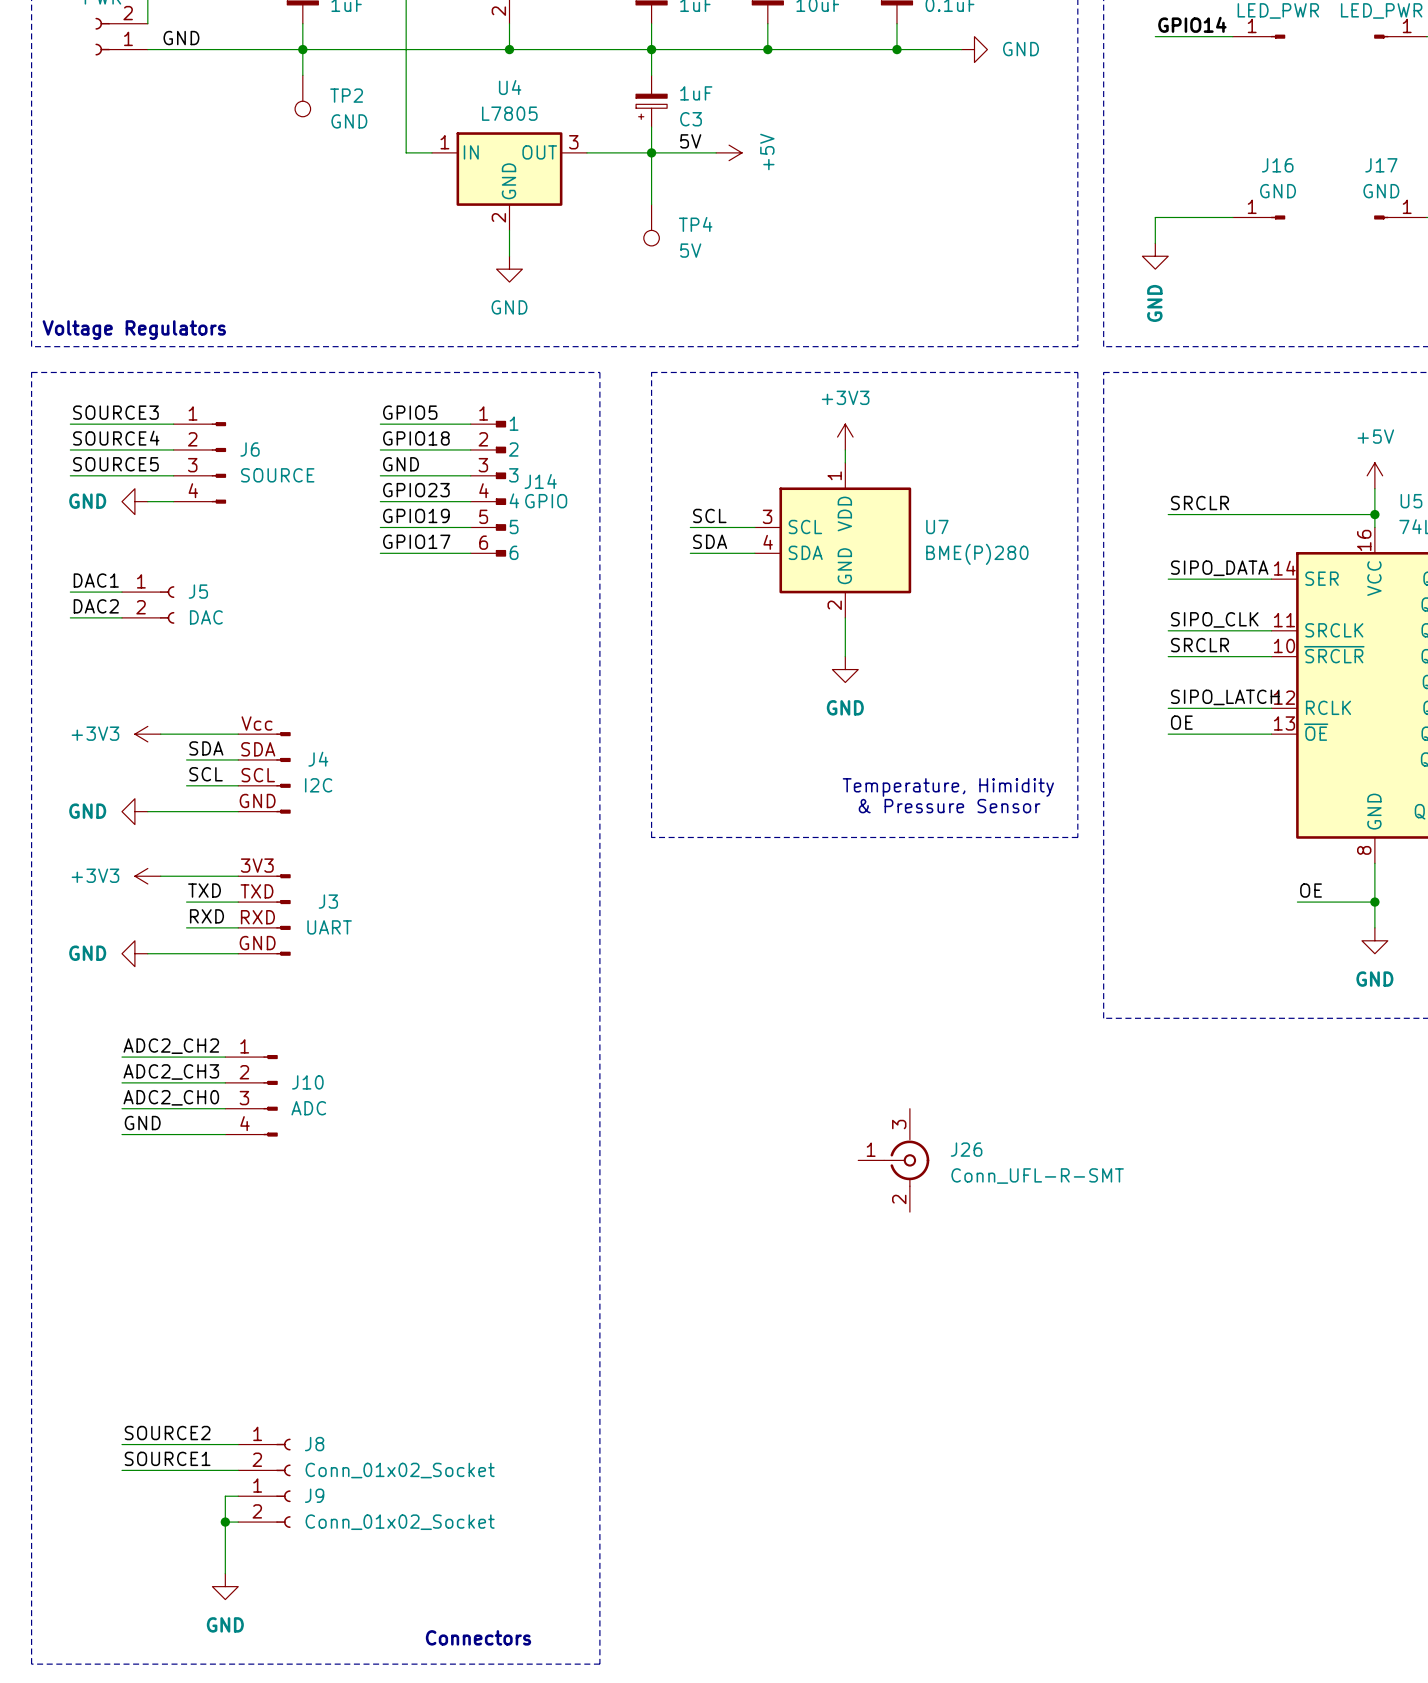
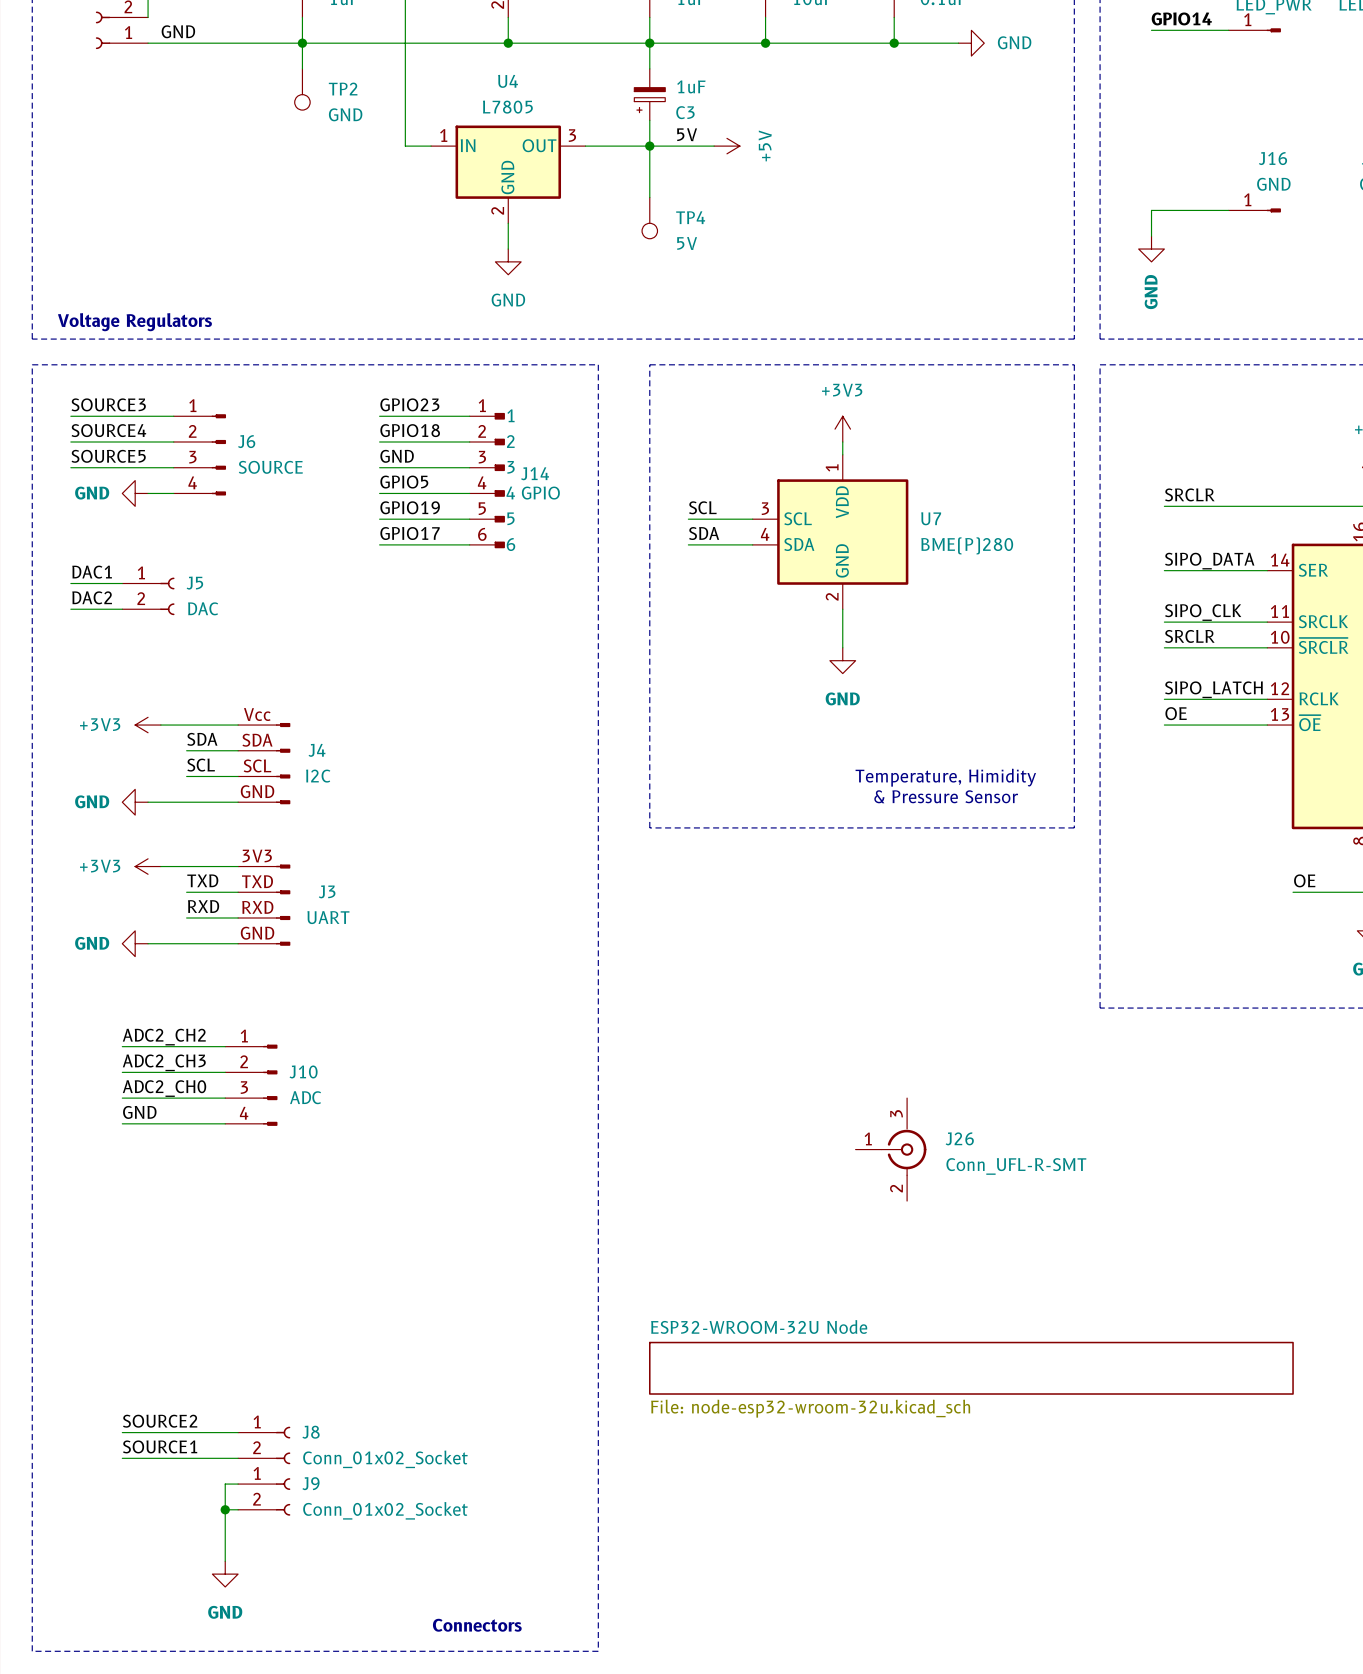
label: GPIO5 (410, 412) -> GPIO23 (409, 404)
label: GPIO23 (416, 490) -> GPIO5 (404, 482)
sheet ESP32-WROOM-32U Node: none -> File: node-esp32-wroom-32u.kicad_sch (971, 1368)

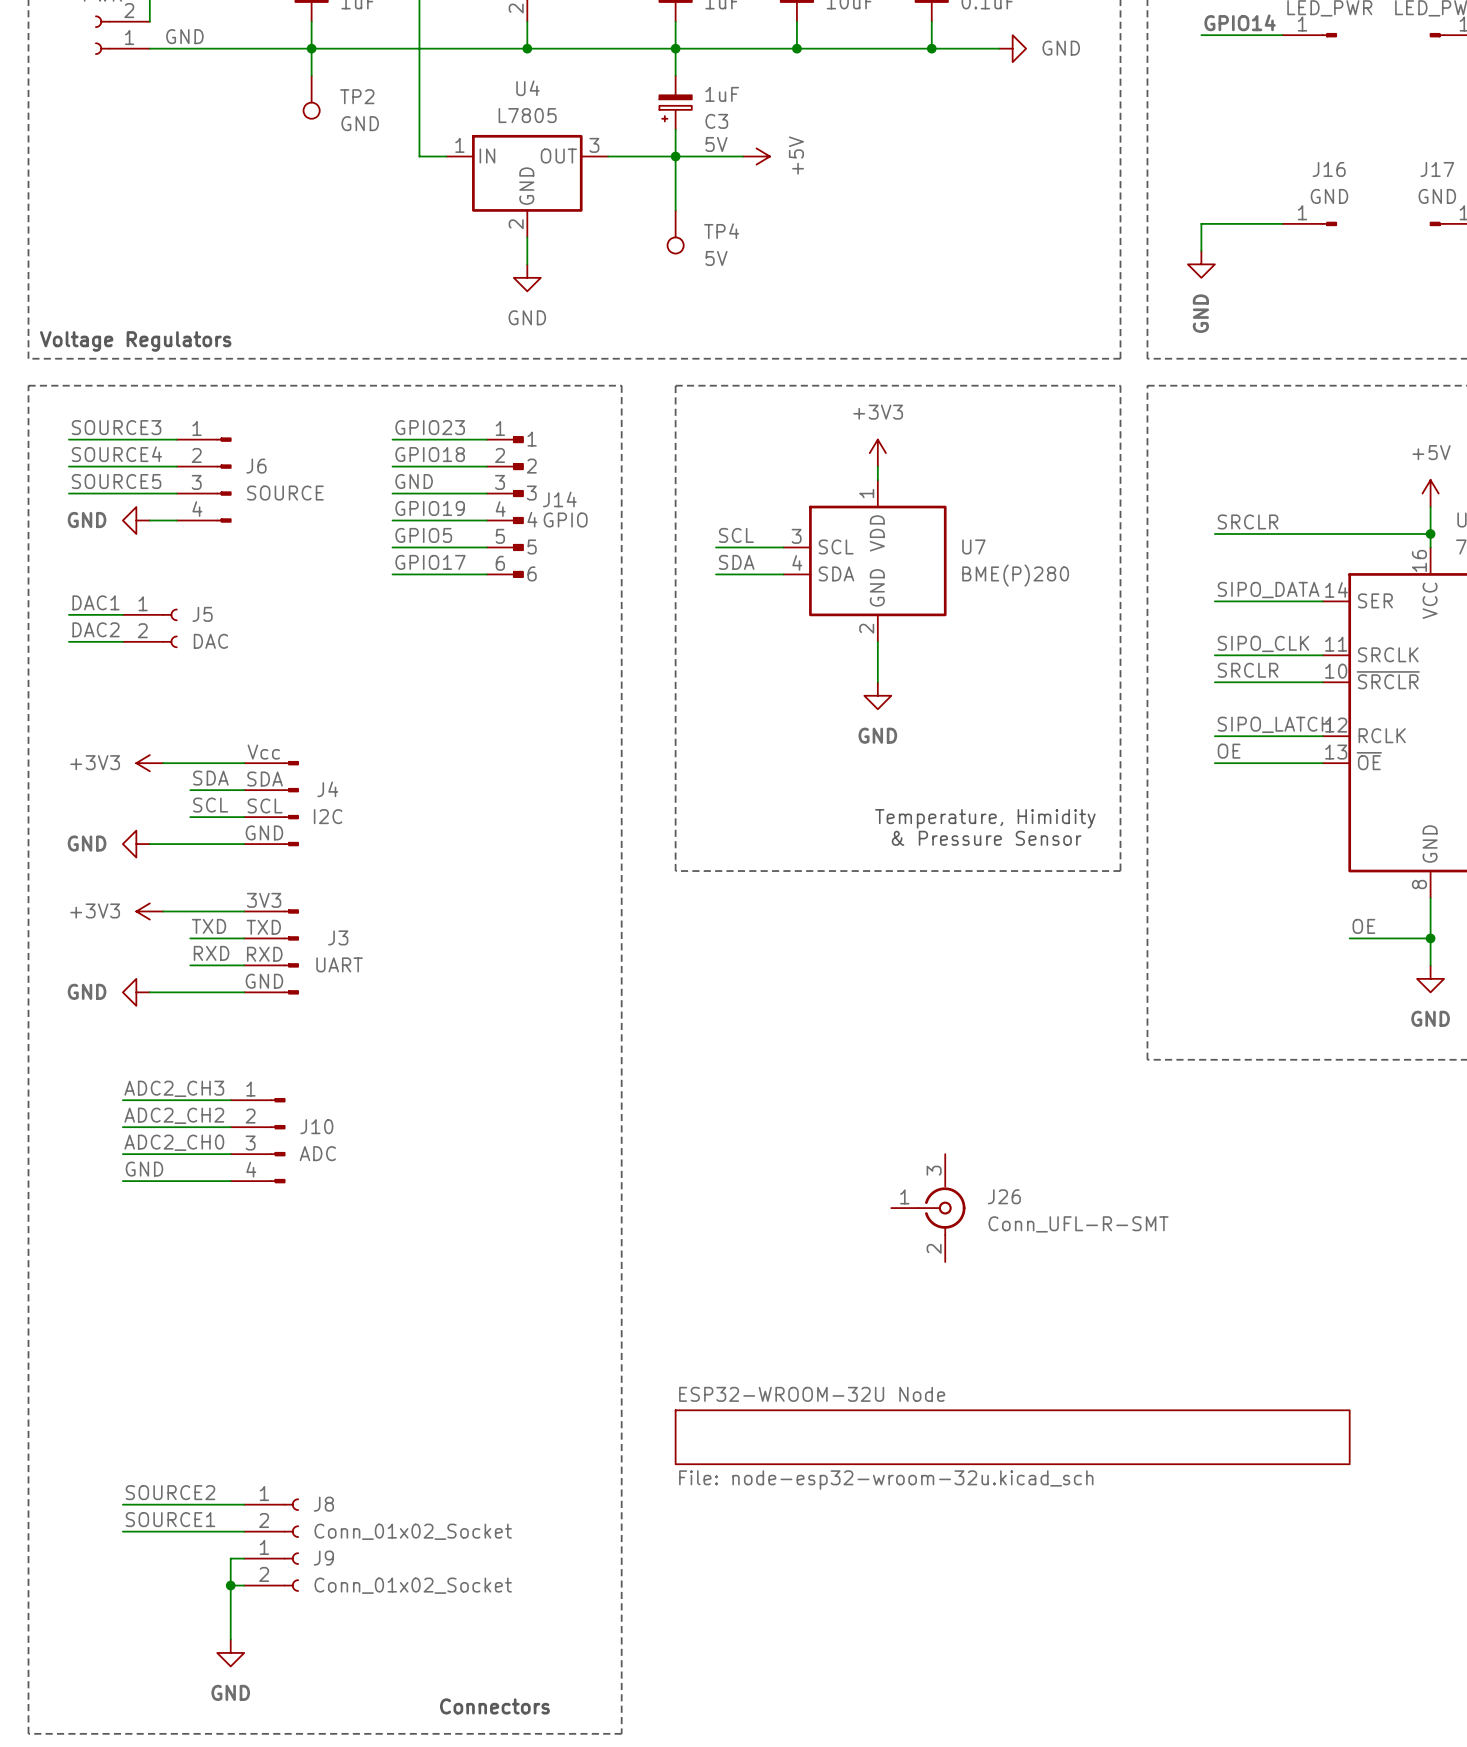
label: GPIO5 (404, 482) -> GPIO19 (430, 508)
label: GPIO19 (410, 507) -> GPIO5 (423, 535)
label: ADC2_CH2 (164, 1037) -> ADC2_CH3 (174, 1088)
label: ADC2_CH3 (164, 1062) -> ADC2_CH2 (174, 1115)

